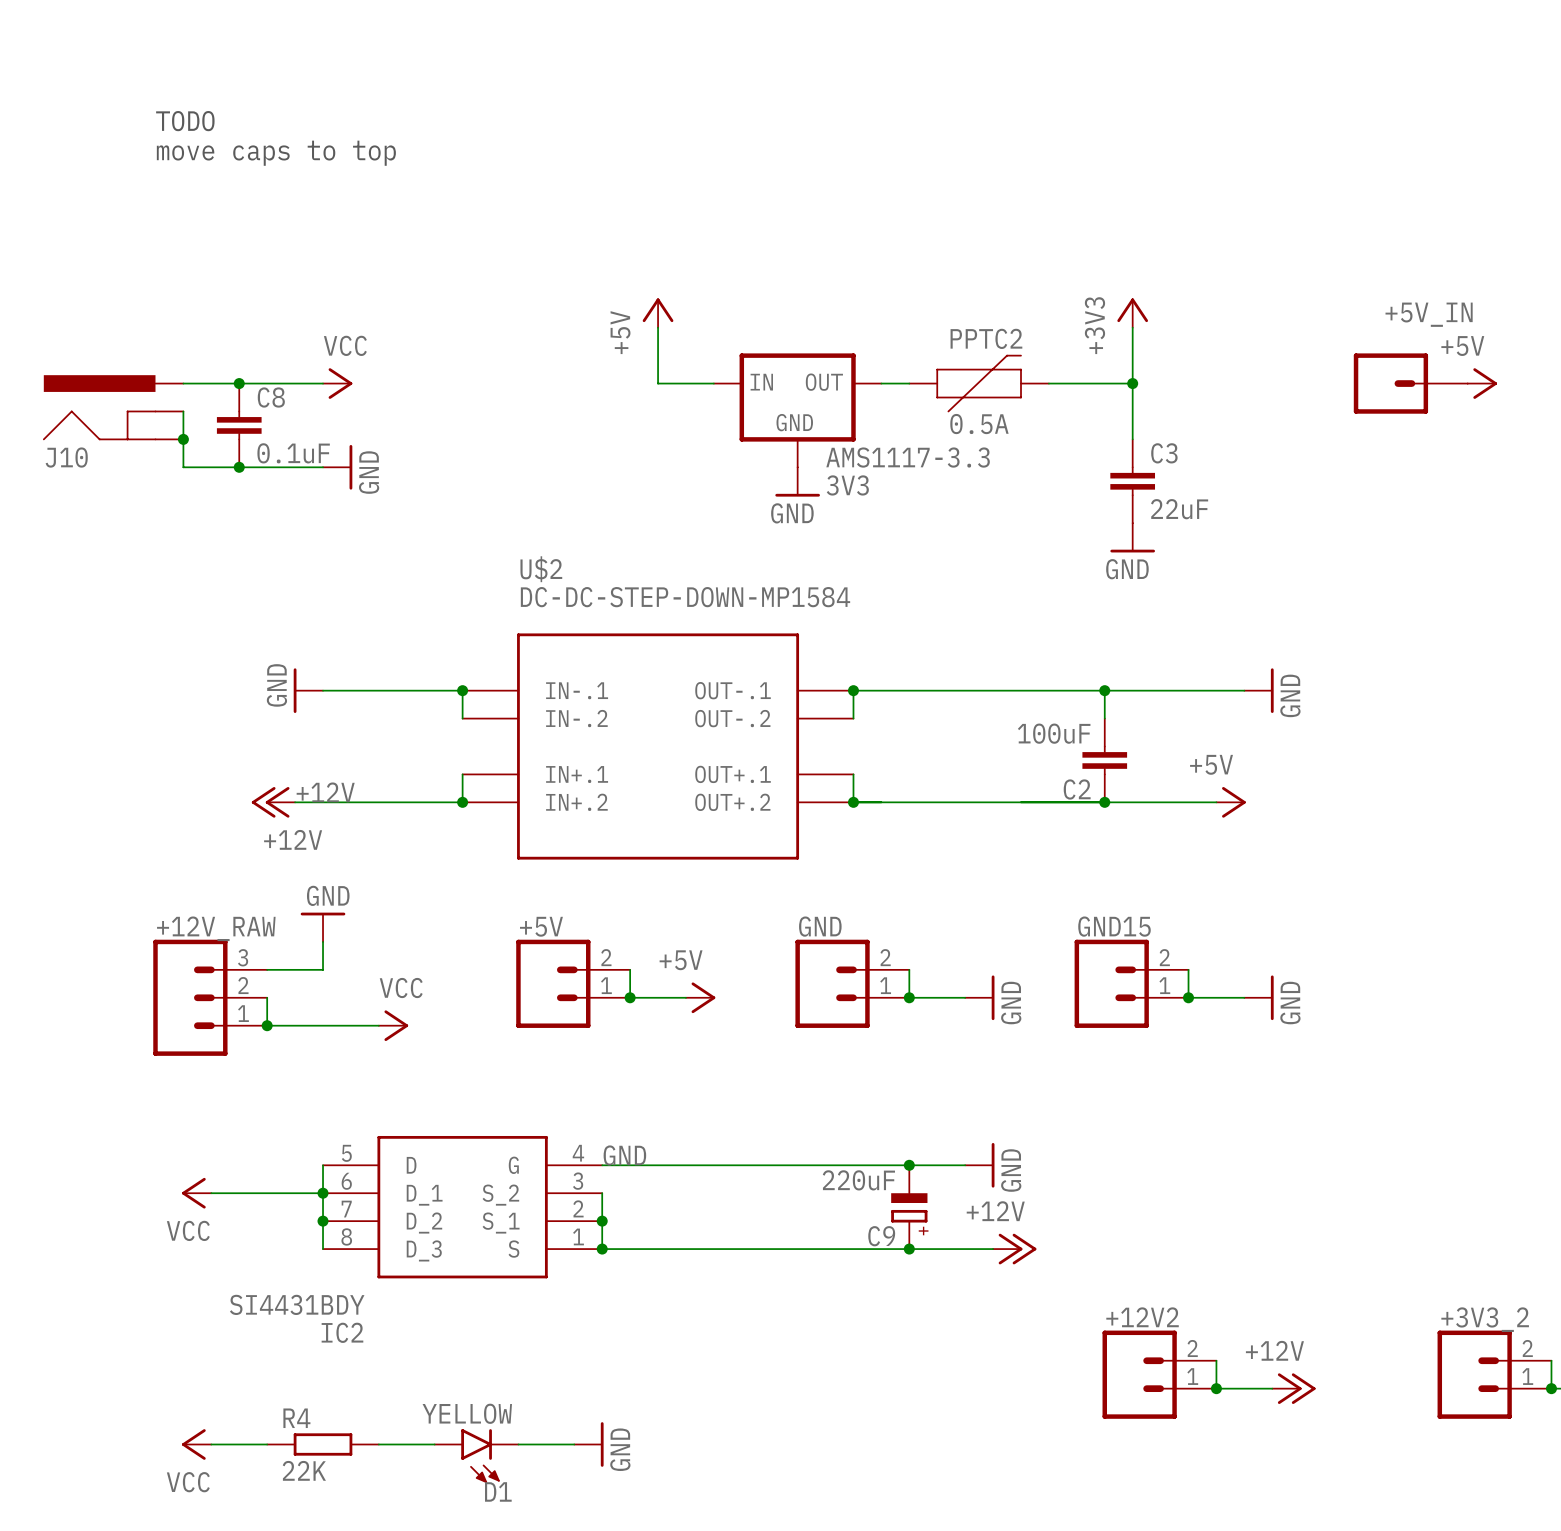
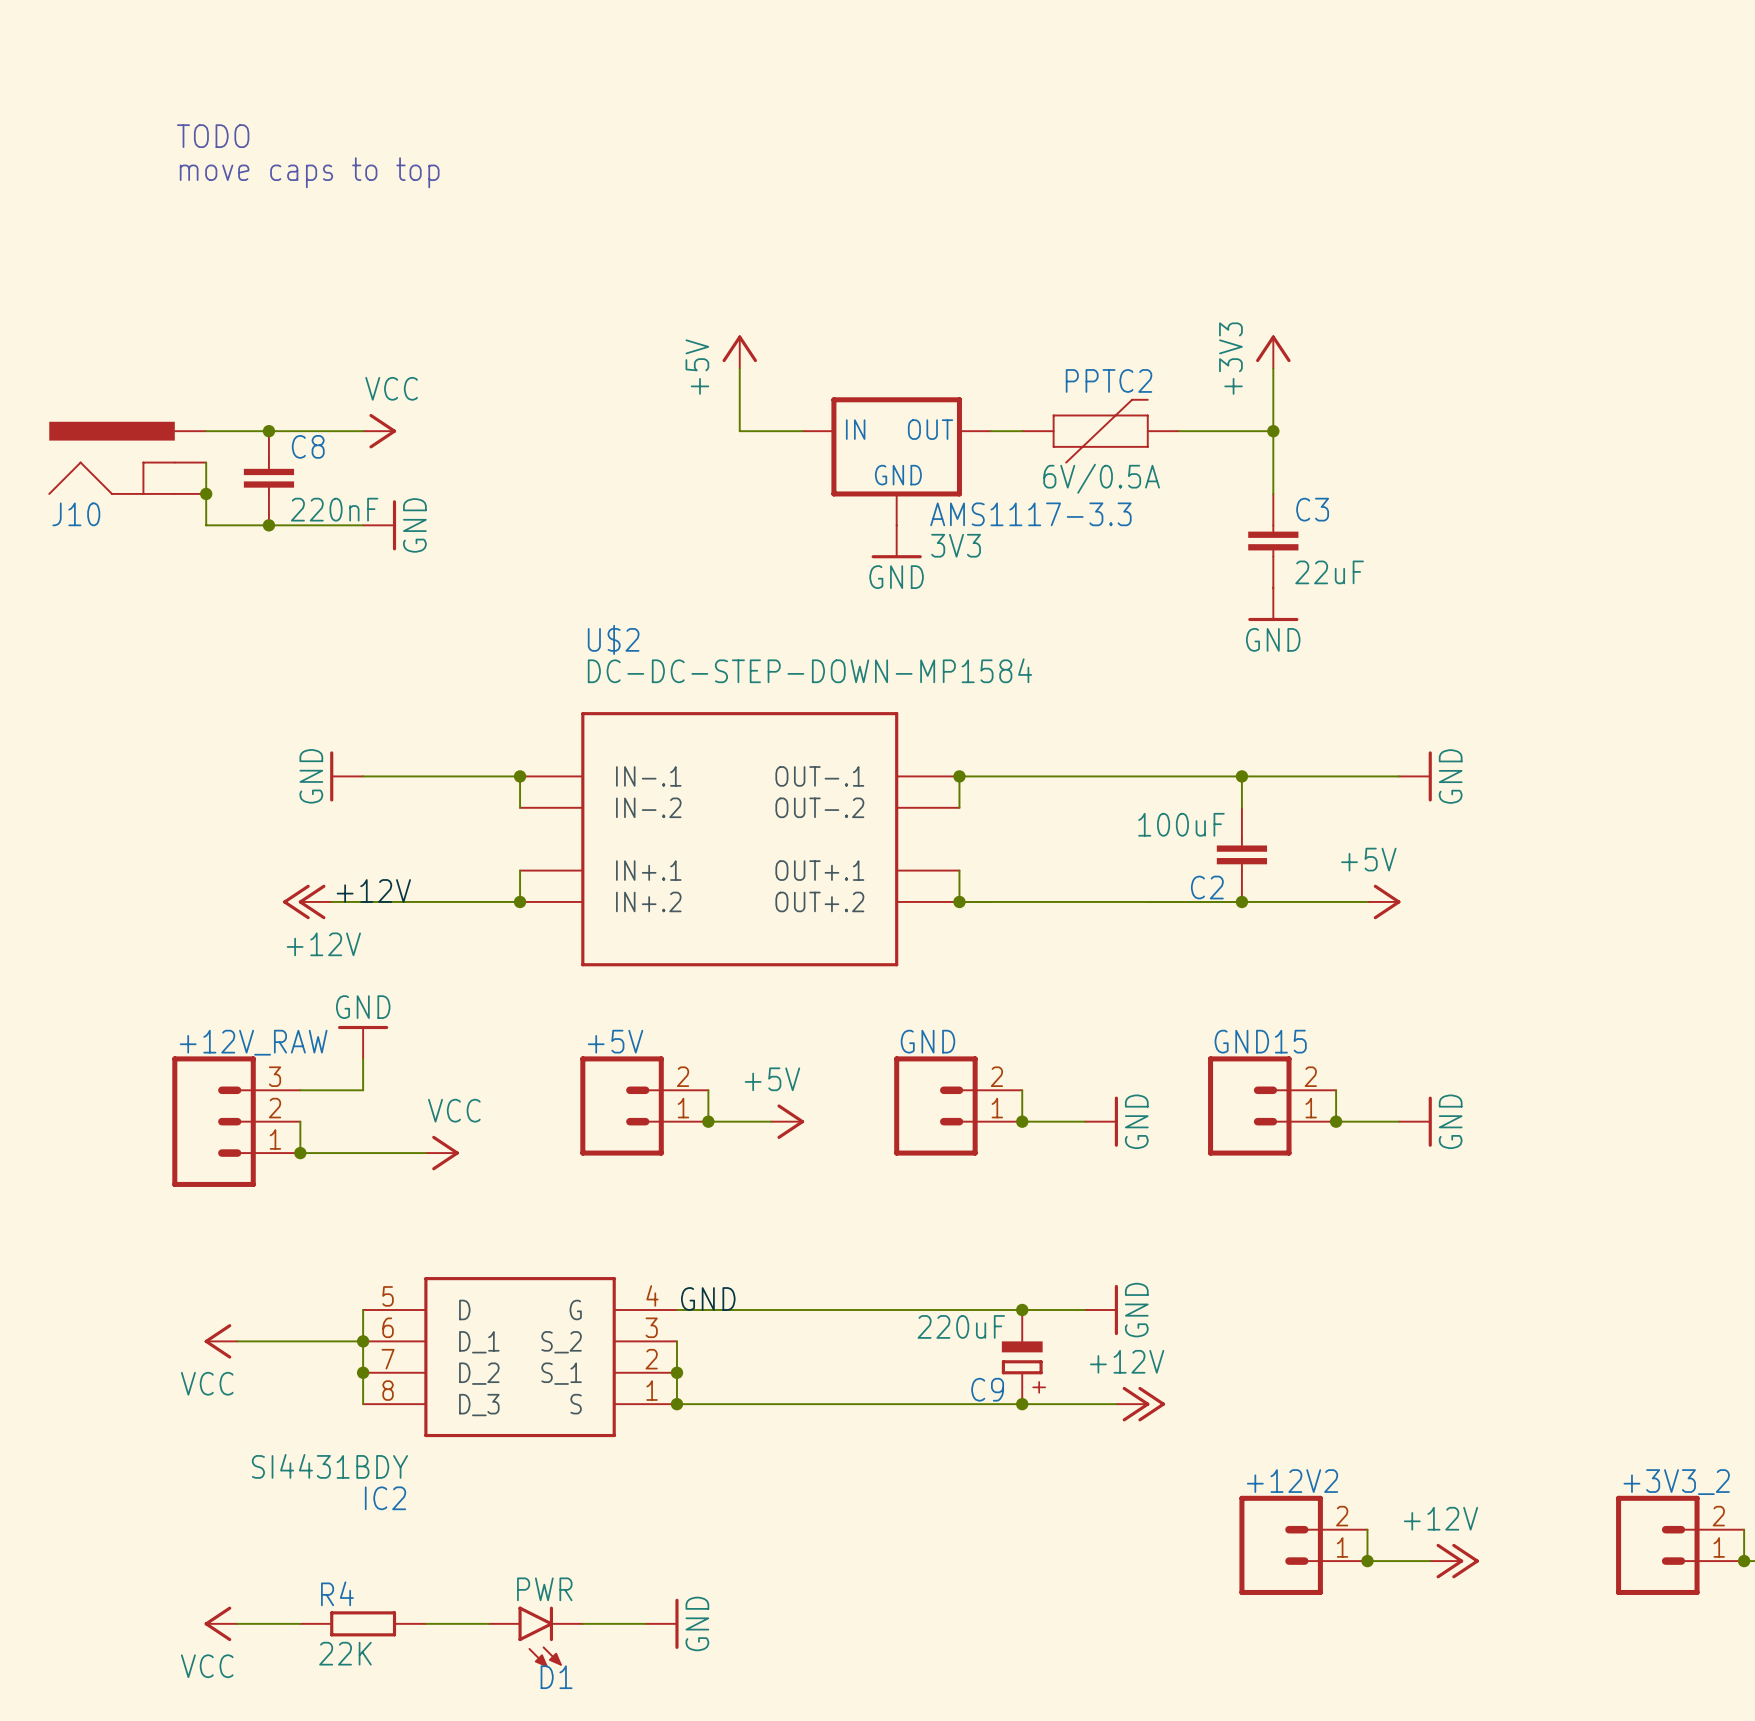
+5V_IN: (1410, 383) -> none
power symbol: +5V (1482, 383) -> none
PPTC2 value: 0.5A (979, 424) -> 6V/0.5A (1101, 478)
C8 value: 0.1uF (293, 453) -> 220nF (334, 509)
D1 value: YELLOW (467, 1413) -> PWR (544, 1589)

